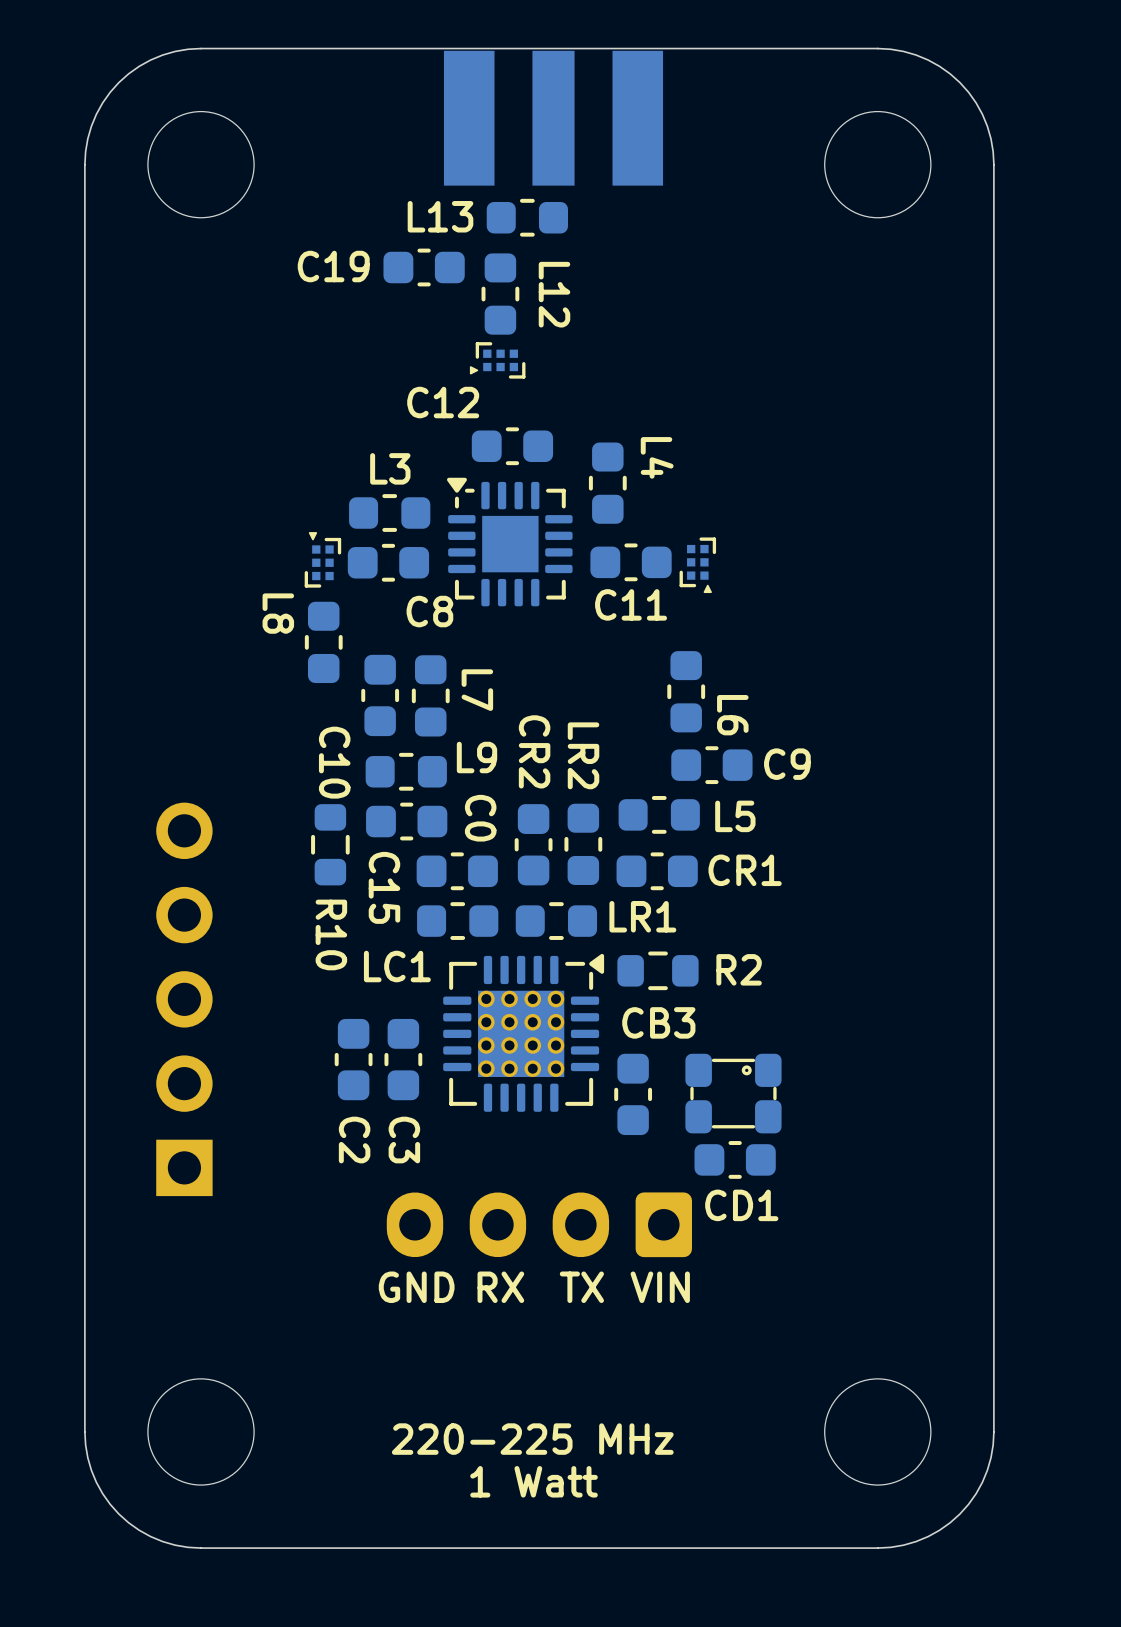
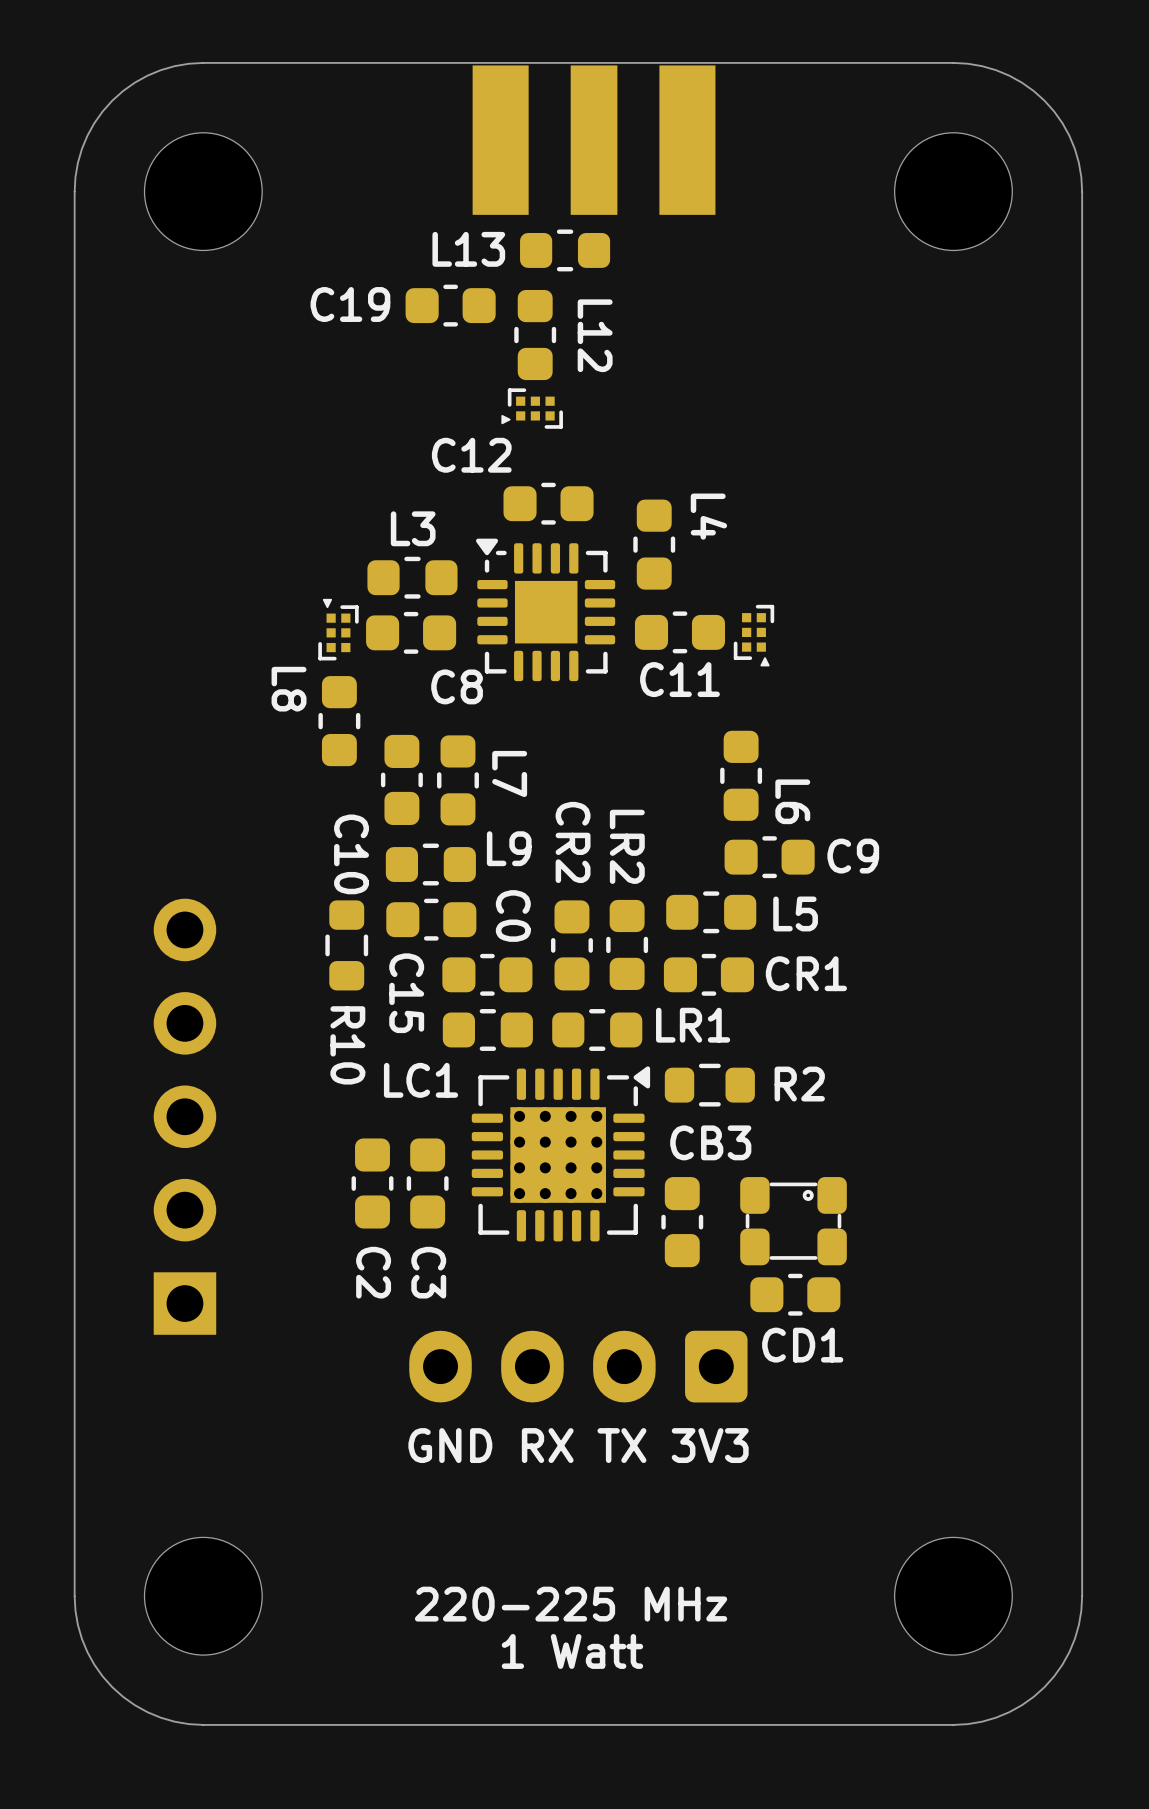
text: GND (416, 1287) -> none
text: RX (500, 1287) -> none
text: TX (581, 1287) -> none
text: VIN (660, 1287) -> none
text: none -> GND RX TX 3V3 (578, 1445)

